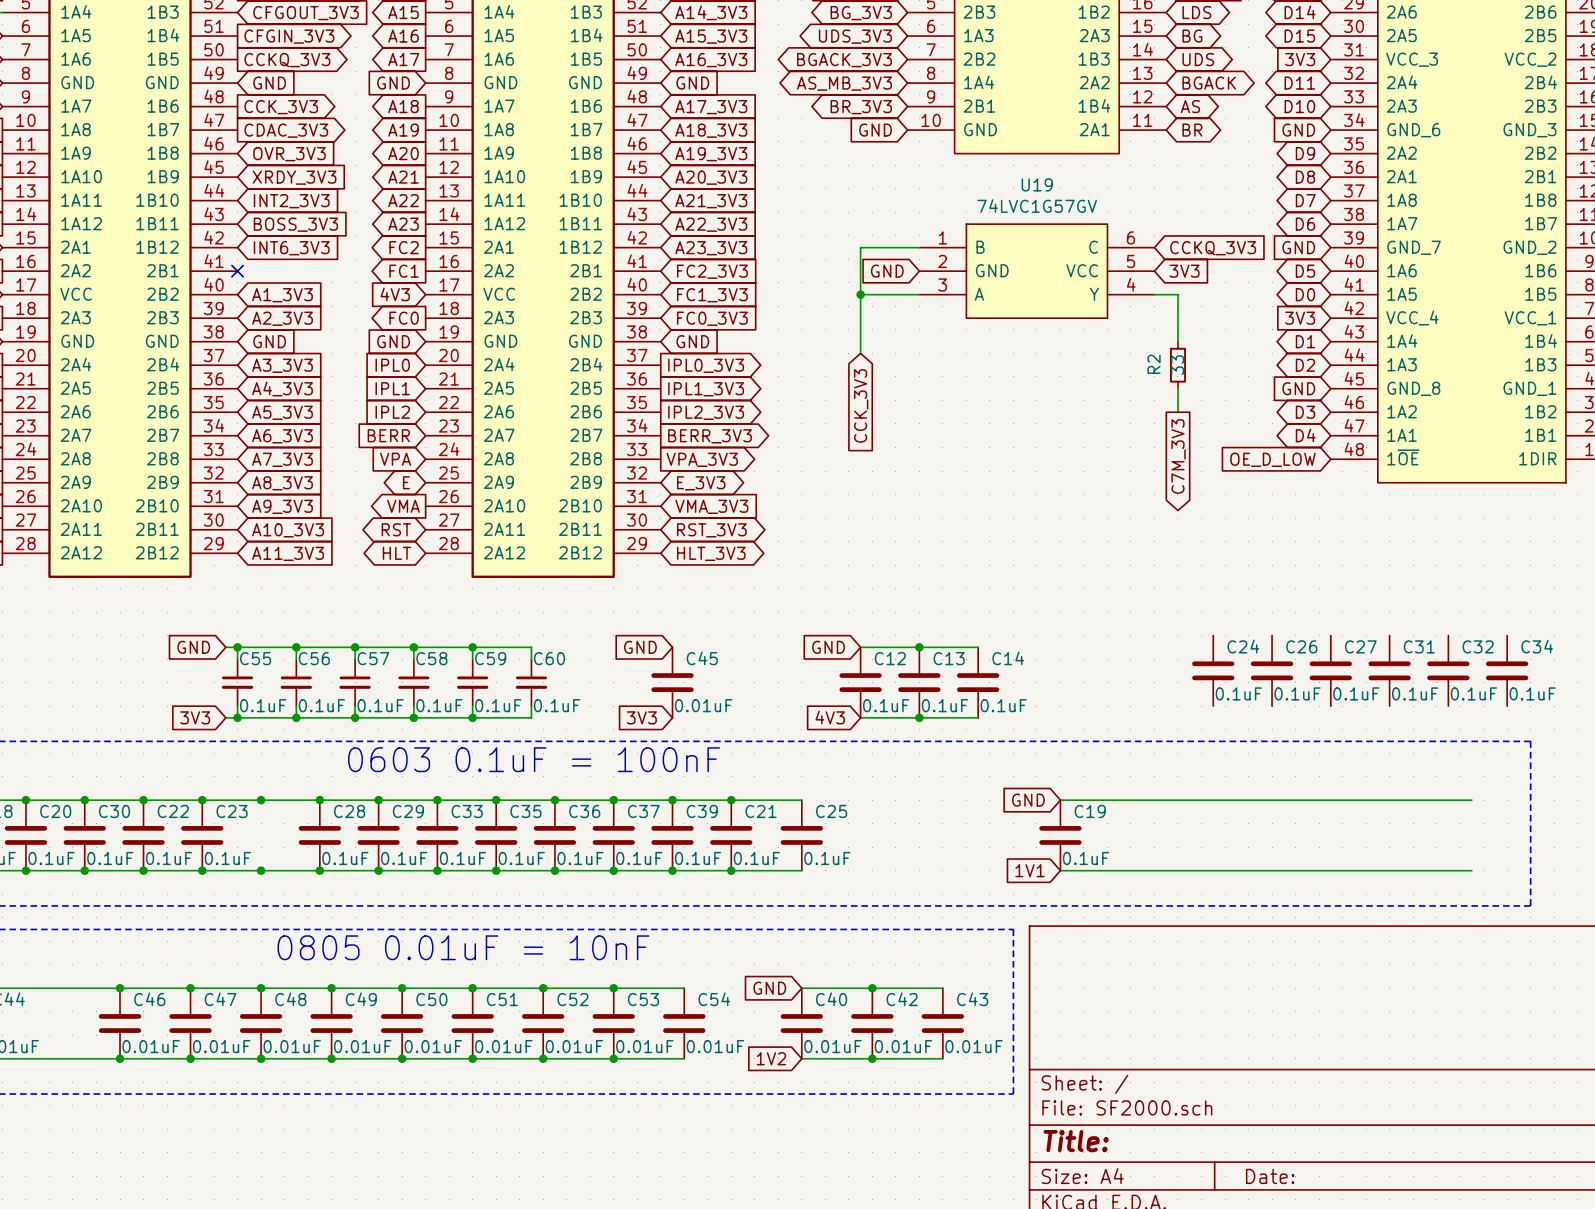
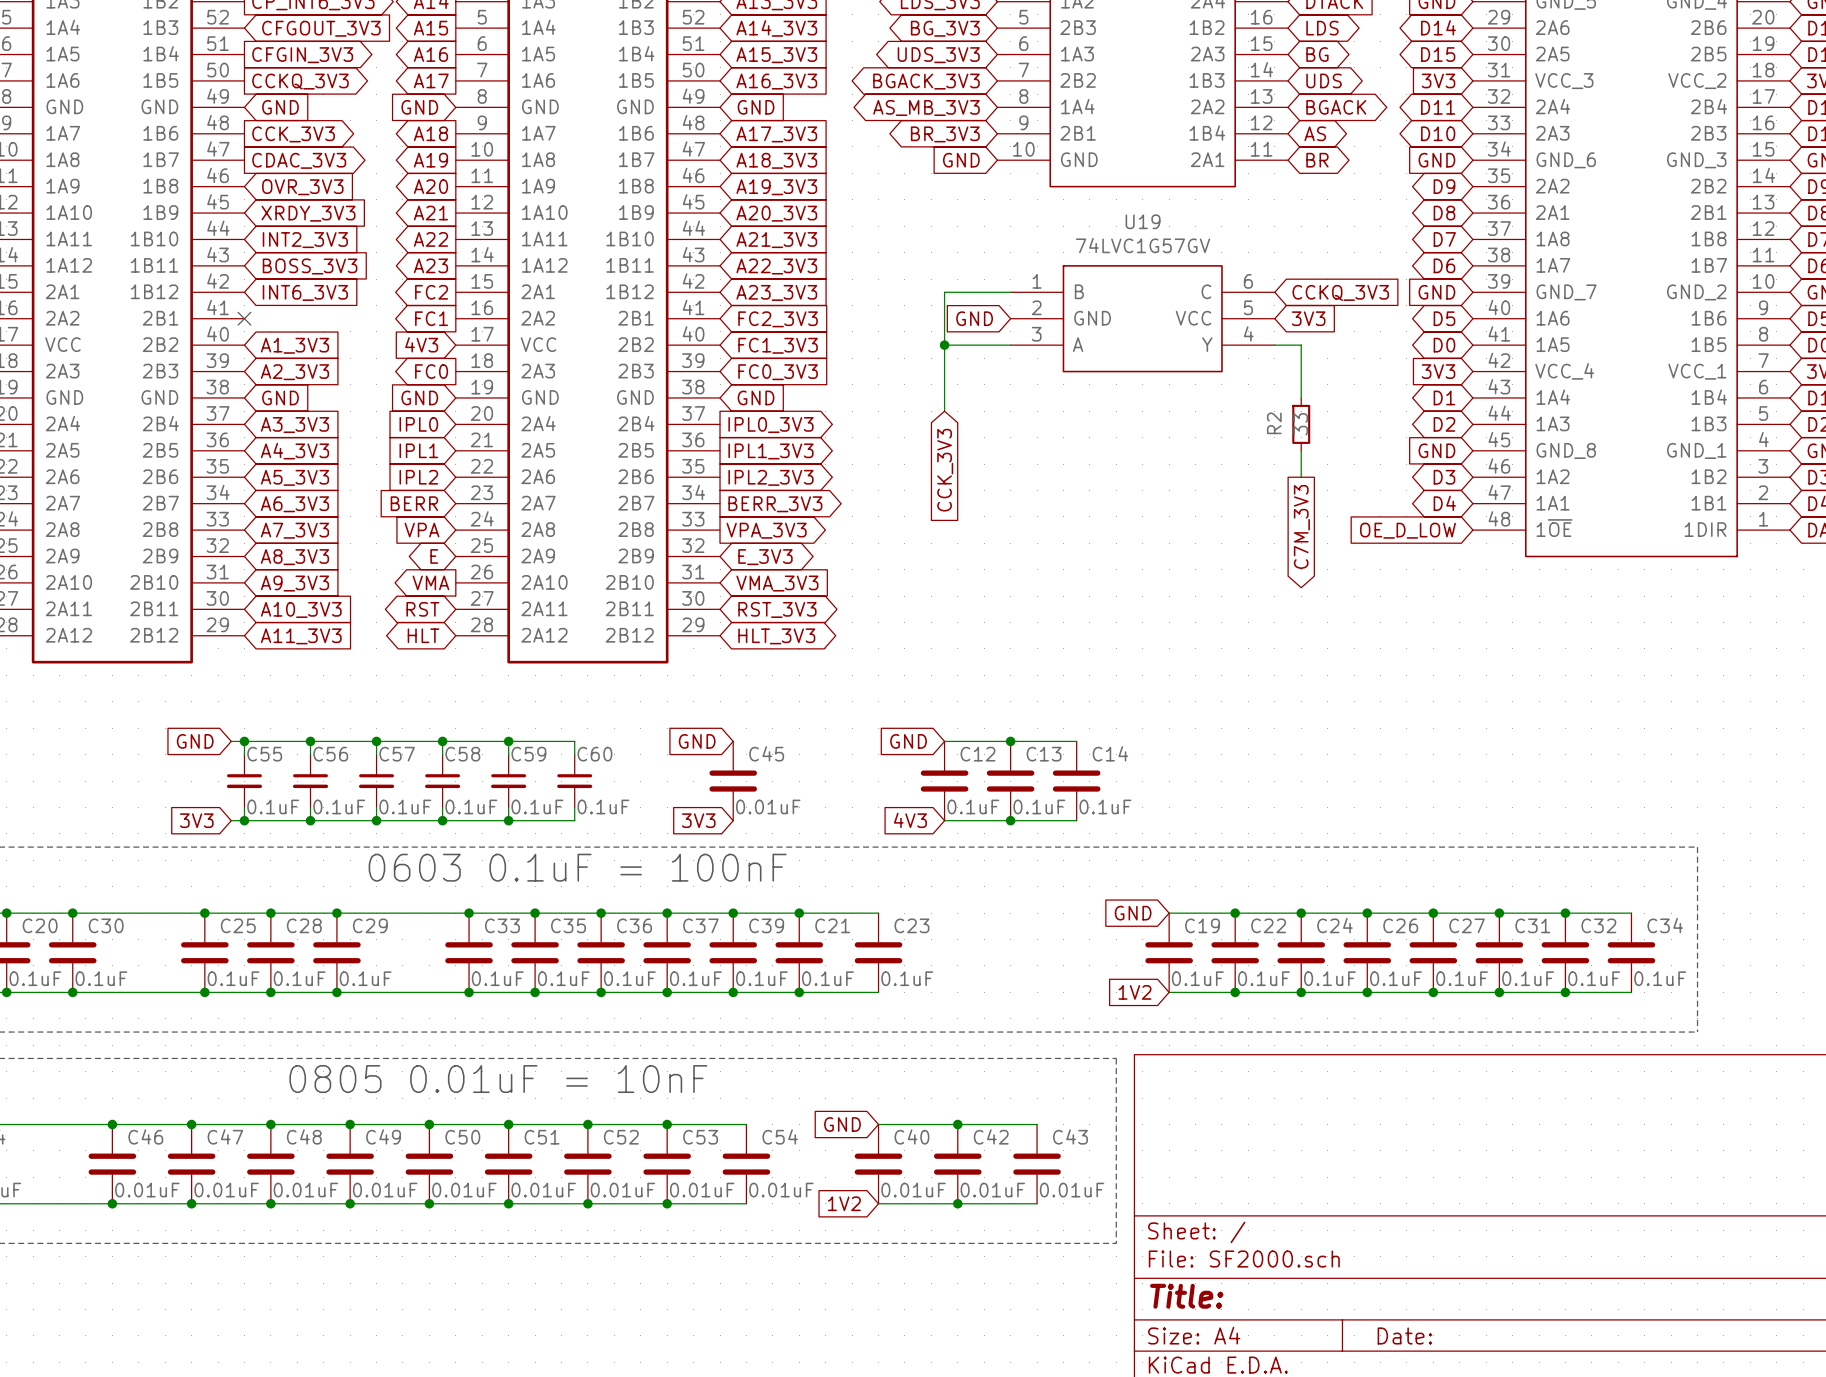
C24 position: (1213, 670) -> (1301, 952)
C26 position: (1272, 670) -> (1367, 952)
C27 position: (1330, 670) -> (1433, 952)
C31 position: (1389, 670) -> (1499, 952)
C32 position: (1448, 670) -> (1565, 952)
C34 position: (1507, 670) -> (1631, 952)
junction: (143, 800) -> none
junction: (378, 800) -> none
junction: none -> (1235, 913)
junction: none -> (1301, 913)
junction: none -> (1367, 913)
junction: none -> (1433, 913)
junction: none -> (1499, 913)
junction: none -> (1565, 913)
C23 name: C23 (232, 811) -> C25 (238, 925)
C28 name: C28 (349, 811) -> C29 (370, 925)
C25 name: C25 (831, 811) -> C23 (911, 925)
C22 position: (143, 835) -> (1235, 952)
C28: none -> 0.1uF (270, 952)
C29: 0.1uF (378, 835) -> none
junction: (143, 870) -> none
junction: (378, 870) -> none
global label: 1V1 (1030, 870) -> 1V2 (1134, 992)
junction: none -> (1235, 992)
junction: none -> (1301, 992)
junction: none -> (1367, 992)
junction: none -> (1433, 992)
junction: none -> (1499, 992)
junction: none -> (1565, 992)

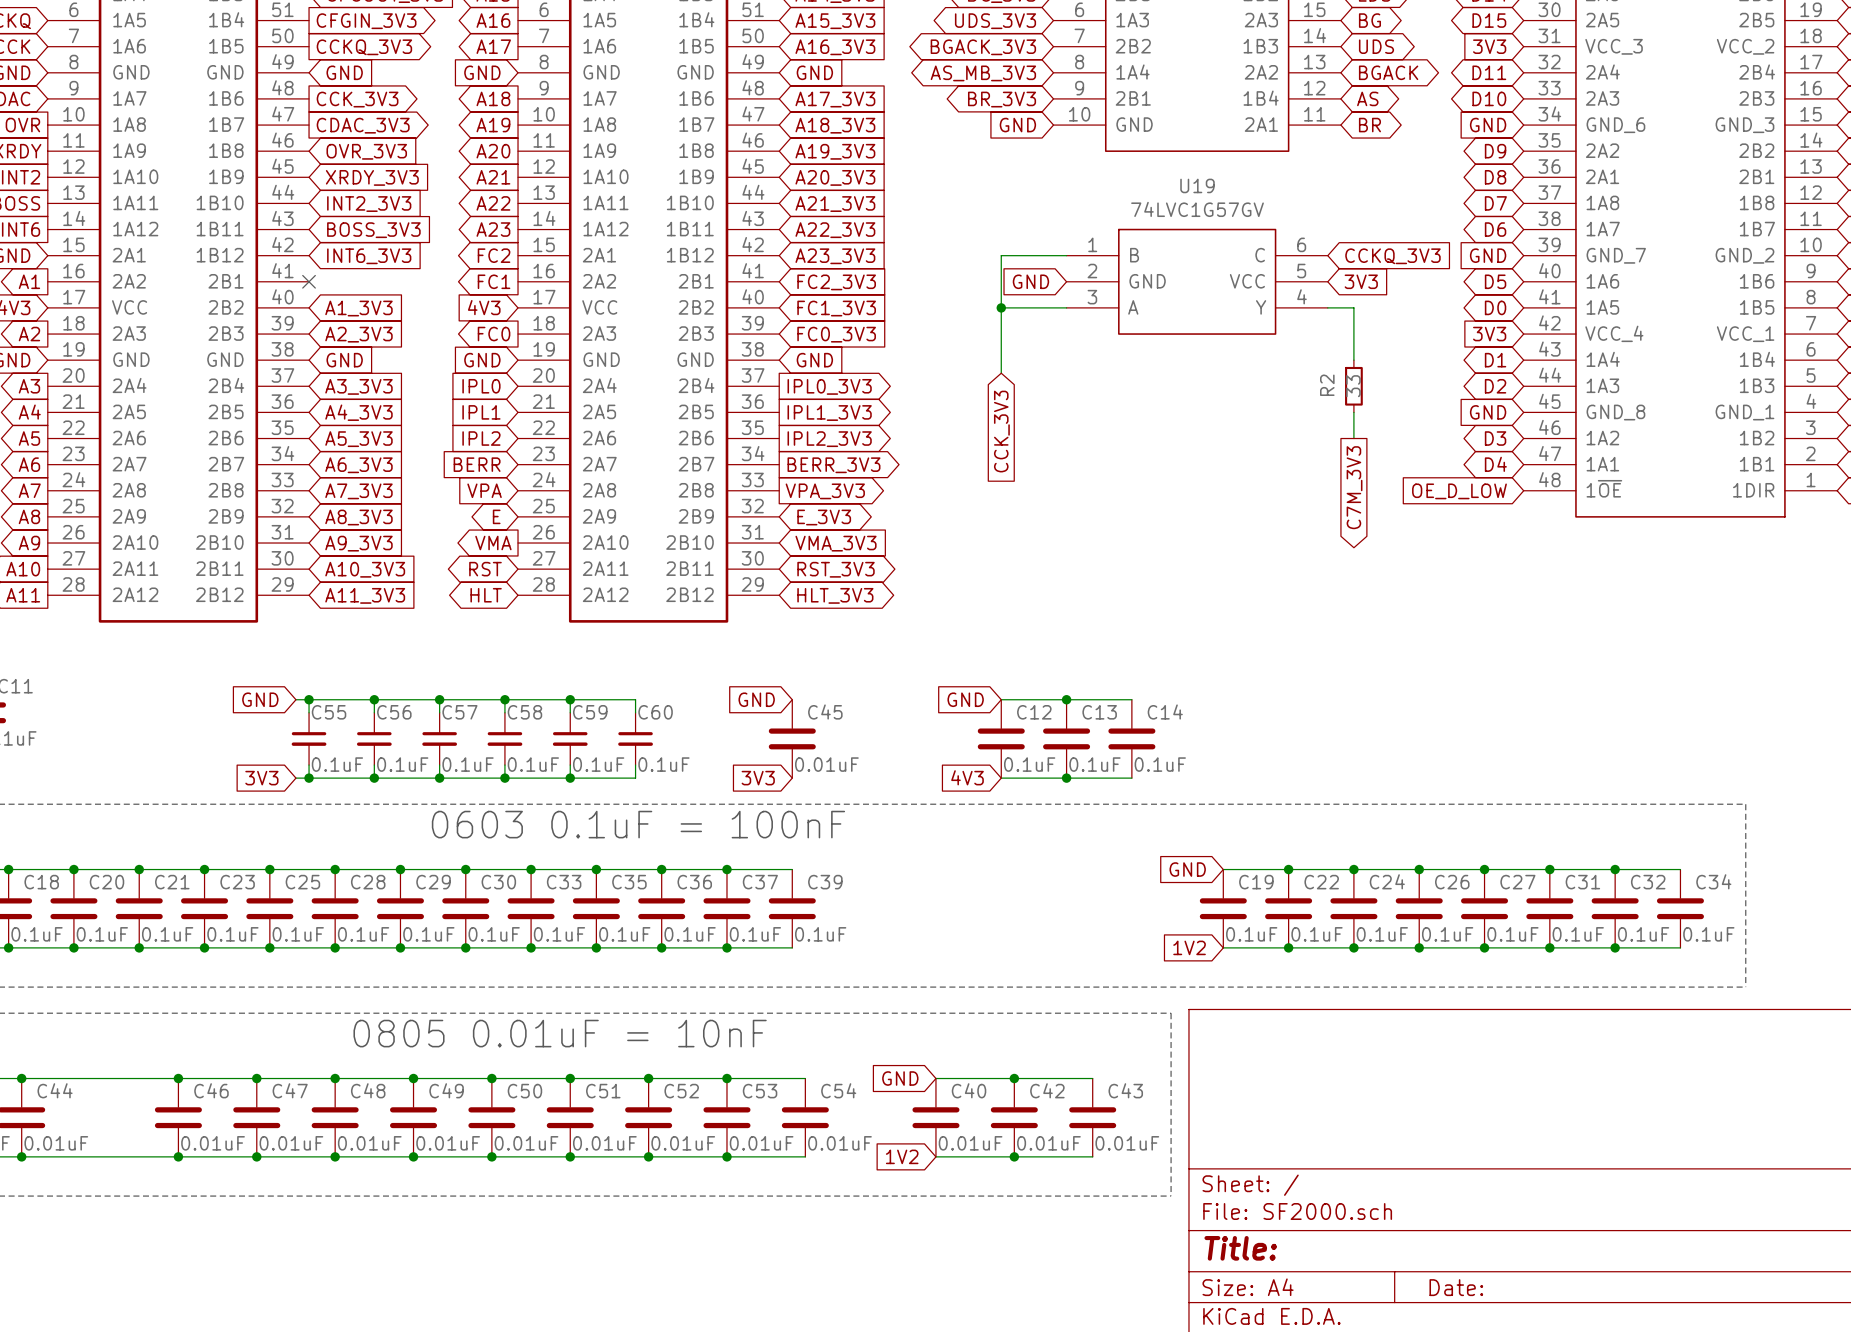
junction: none -> (204, 869)
junction: none -> (465, 869)
wire: (733, 913) (878, 913) -> none
junction: (733, 913) -> none
junction: (799, 913) -> none
C30 name: C30 (106, 925) -> C21 (172, 882)
C30: none -> 0.1uF (465, 908)
C21: 0.1uF (799, 952) -> none
C23 position: (878, 952) -> (204, 908)
junction: none -> (204, 947)
junction: none -> (465, 947)
wire: (733, 992) (878, 992) -> none
junction: (733, 992) -> none
junction: (799, 992) -> none

